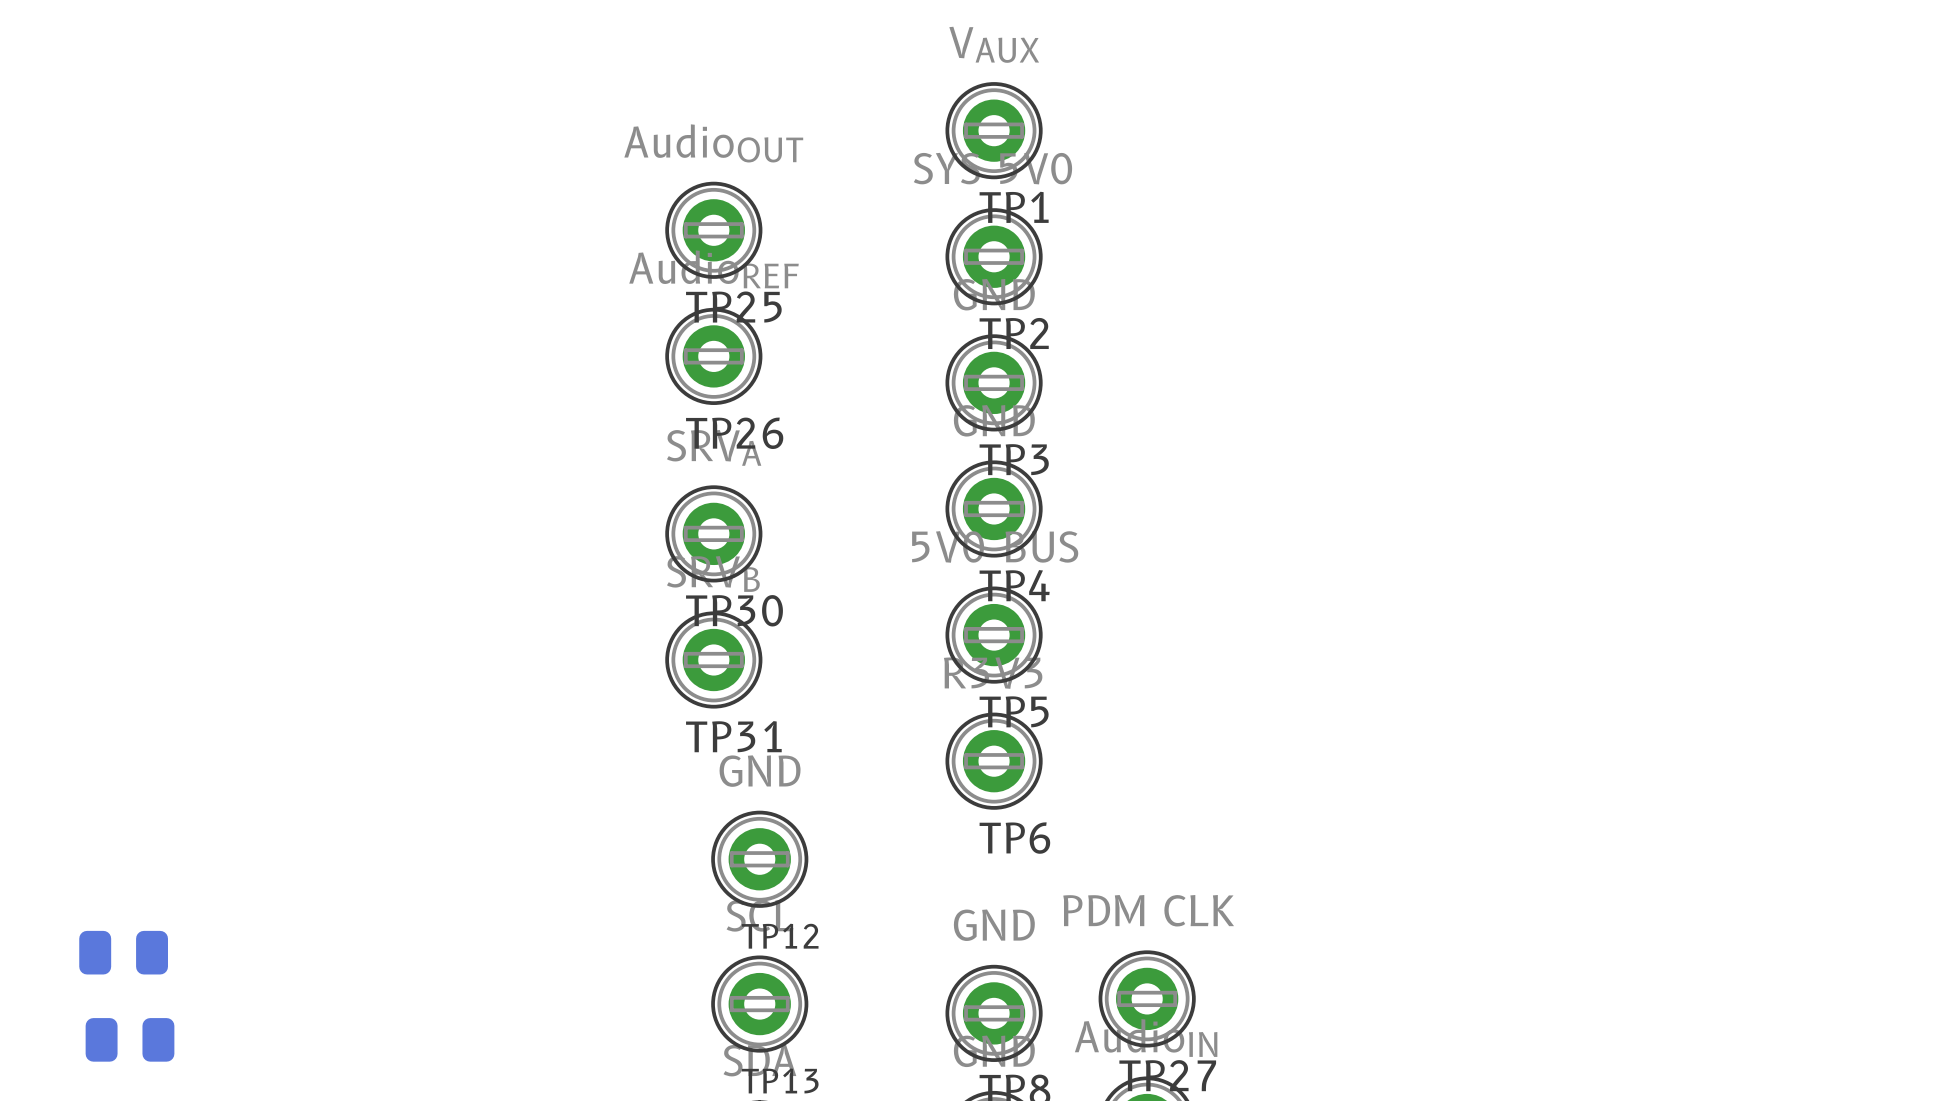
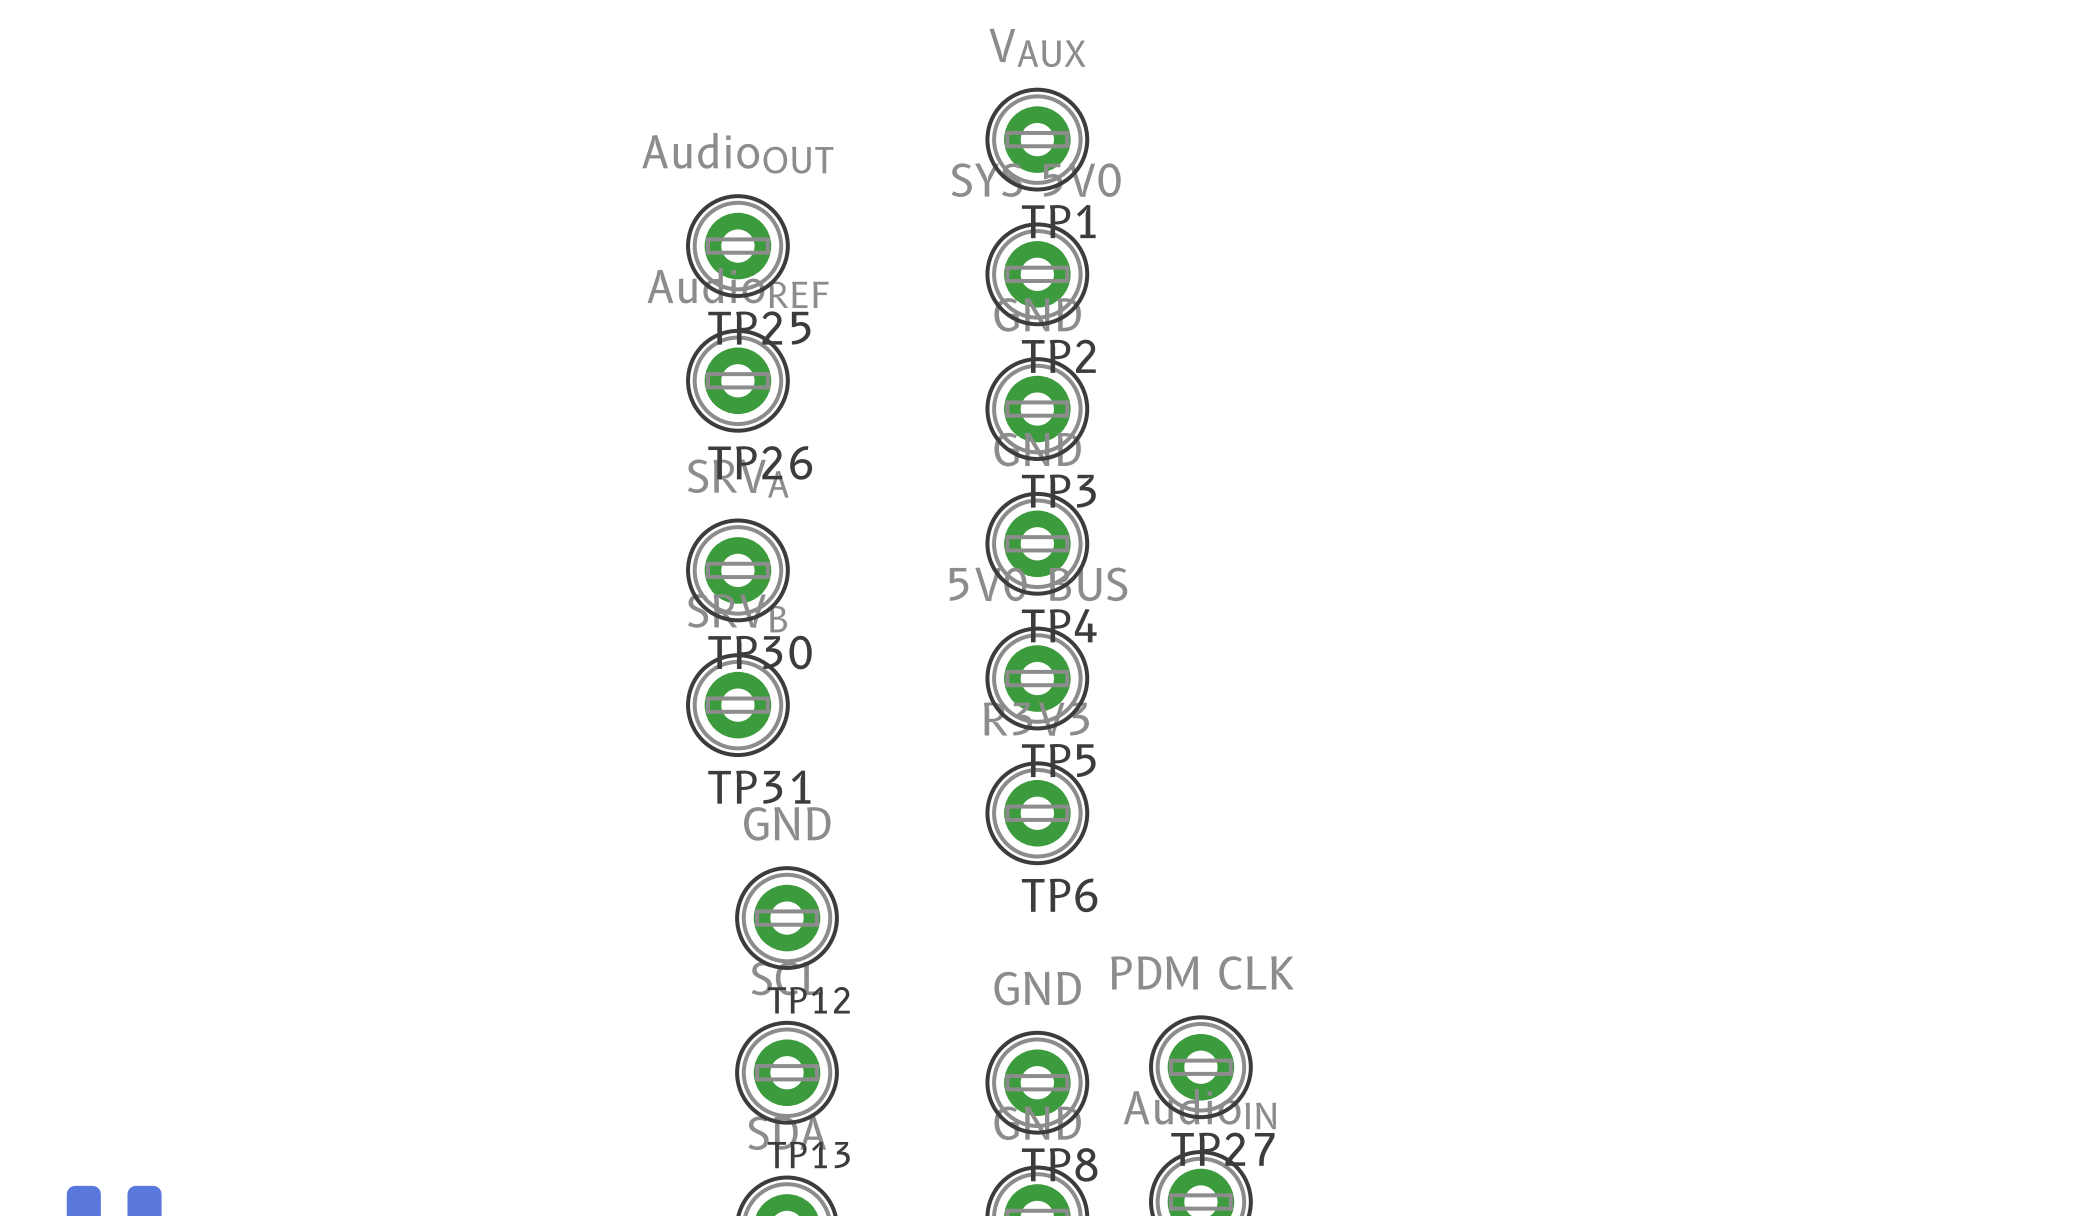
part: (123, 952) -> none
part: (130, 1039) -> none

